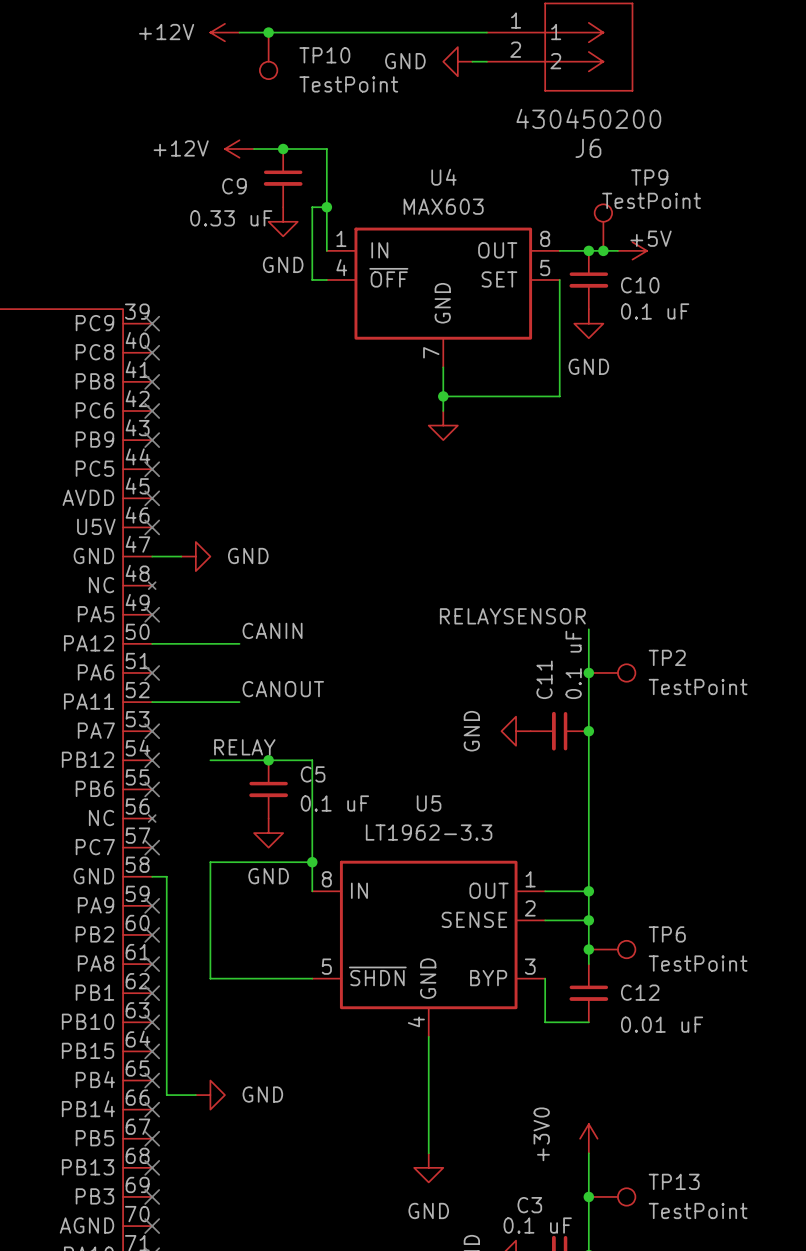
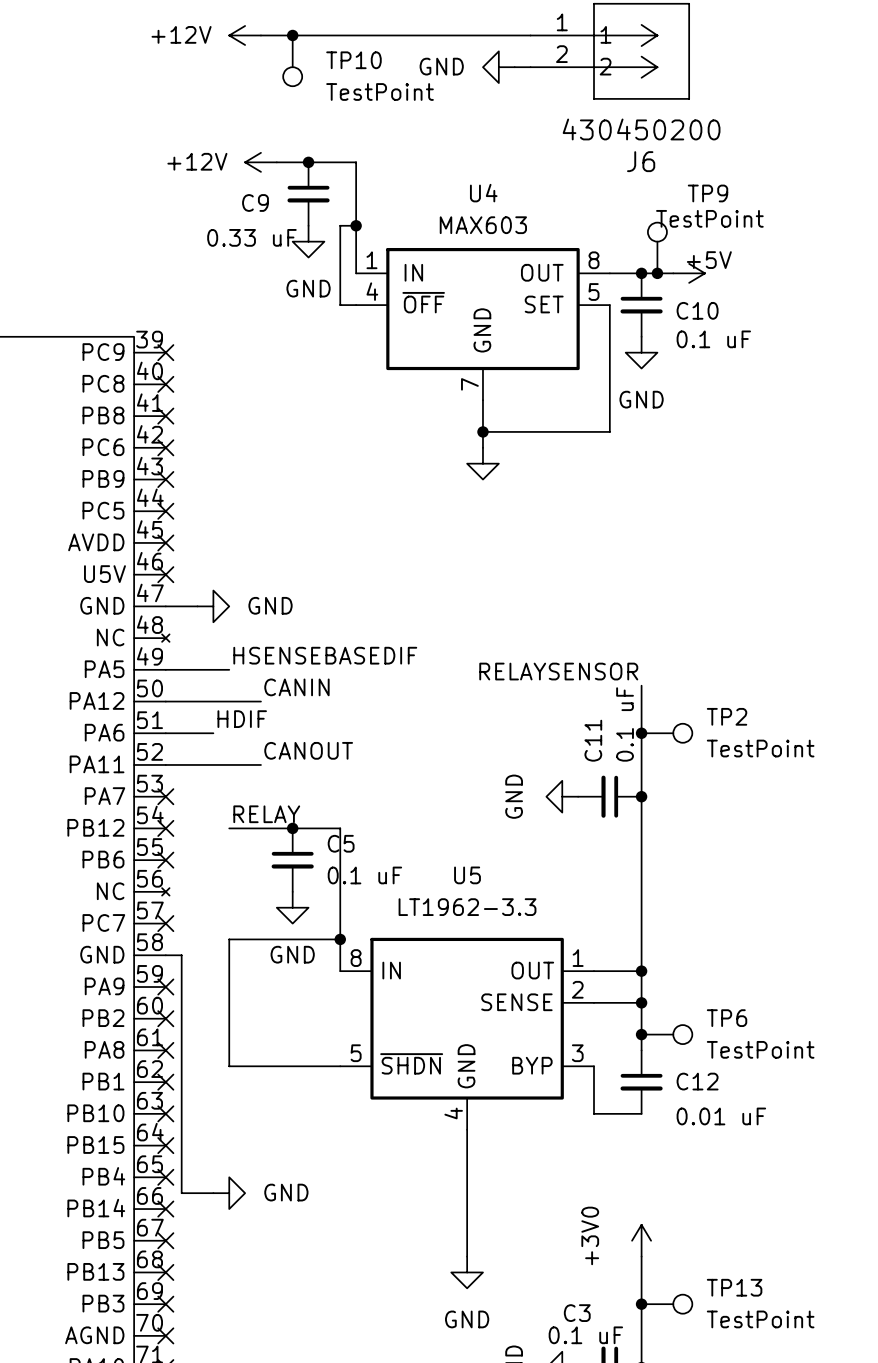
label: none -> HSENSEBASEDIF (325, 655)
wire: none -> (165, 669) (229, 669)
no-connect mark: (152, 614) -> none
label: none -> HDIF (242, 719)
wire: none -> (165, 733) (213, 733)
no-connect mark: (152, 672) -> none

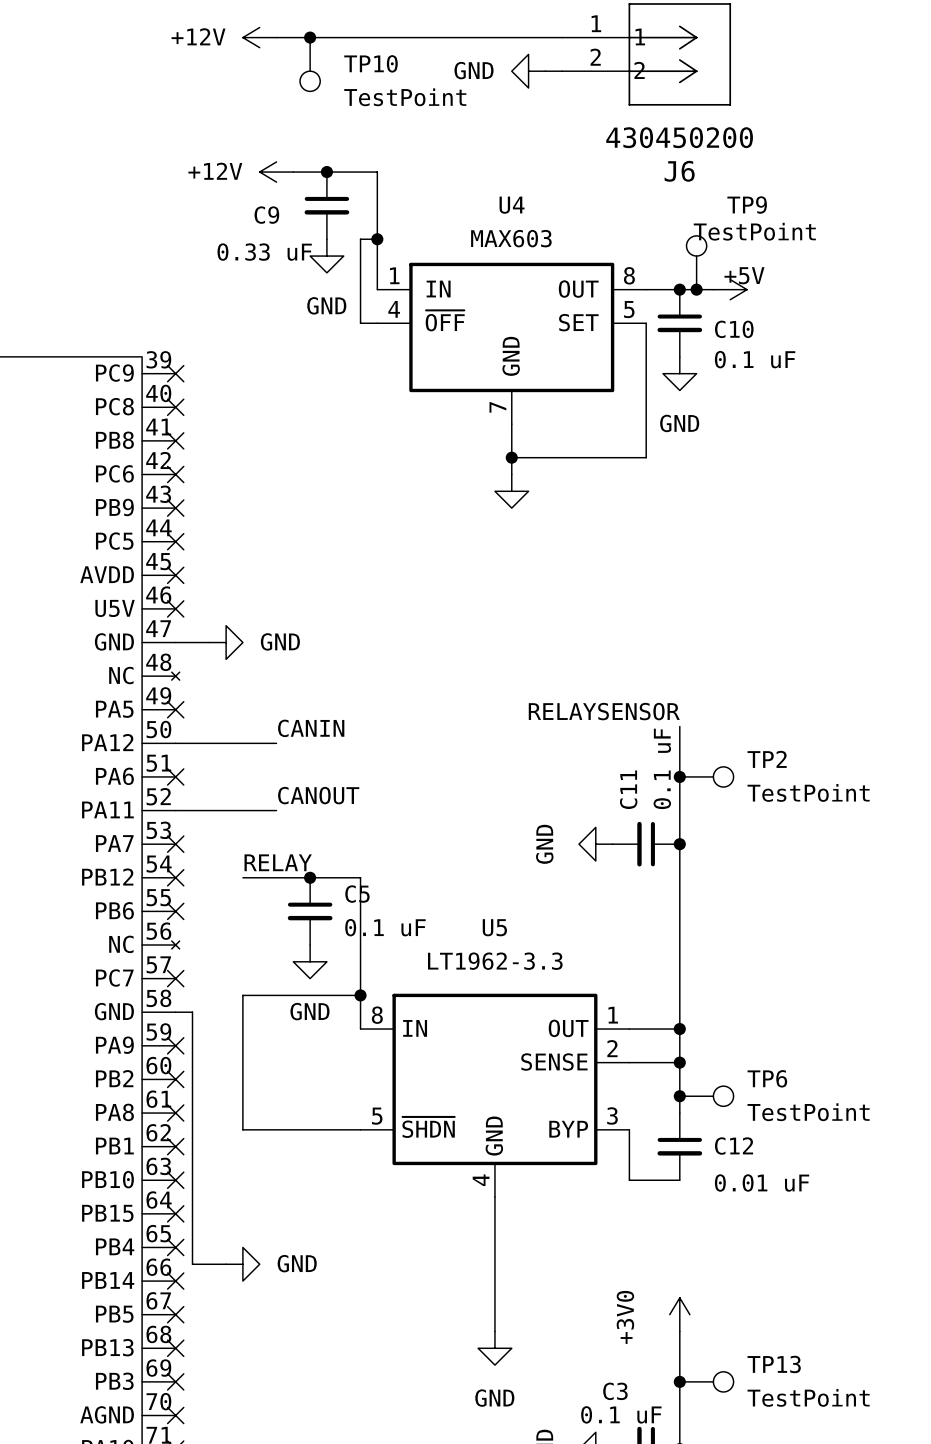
label: HSENSEBASEDIF (325, 655) -> none
wire: (165, 669) (229, 669) -> none
no-connect mark: none -> (175, 709)
label: HDIF (242, 719) -> none
wire: (165, 733) (213, 733) -> none
no-connect mark: none -> (175, 776)

